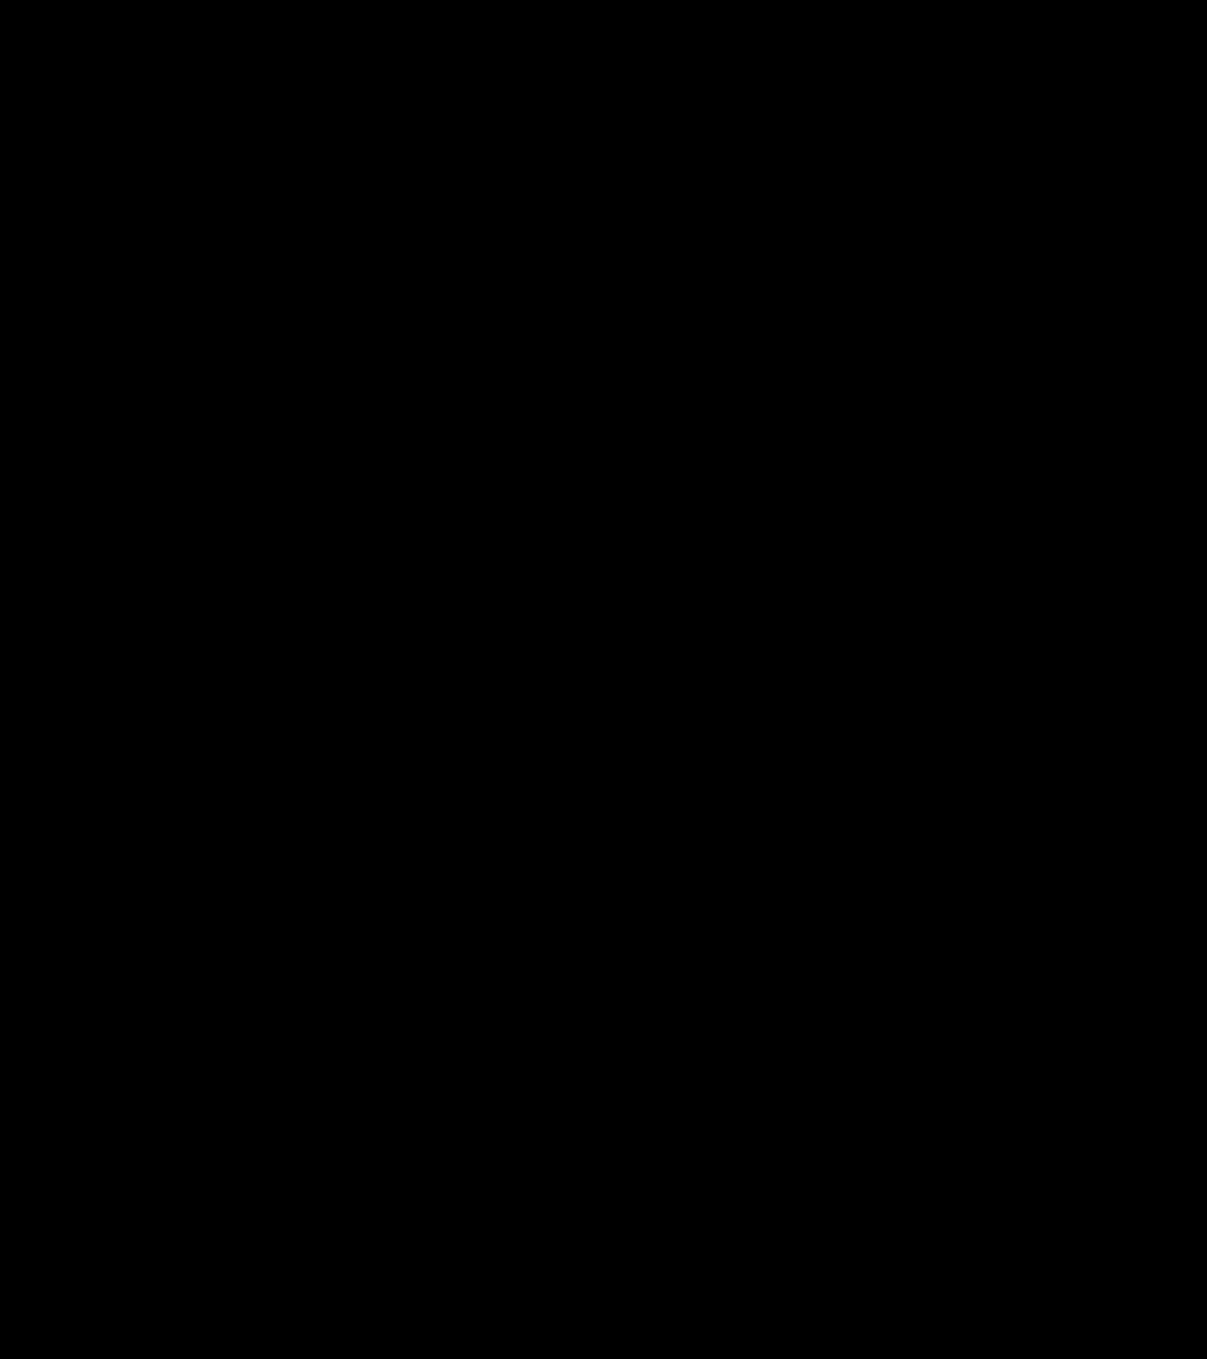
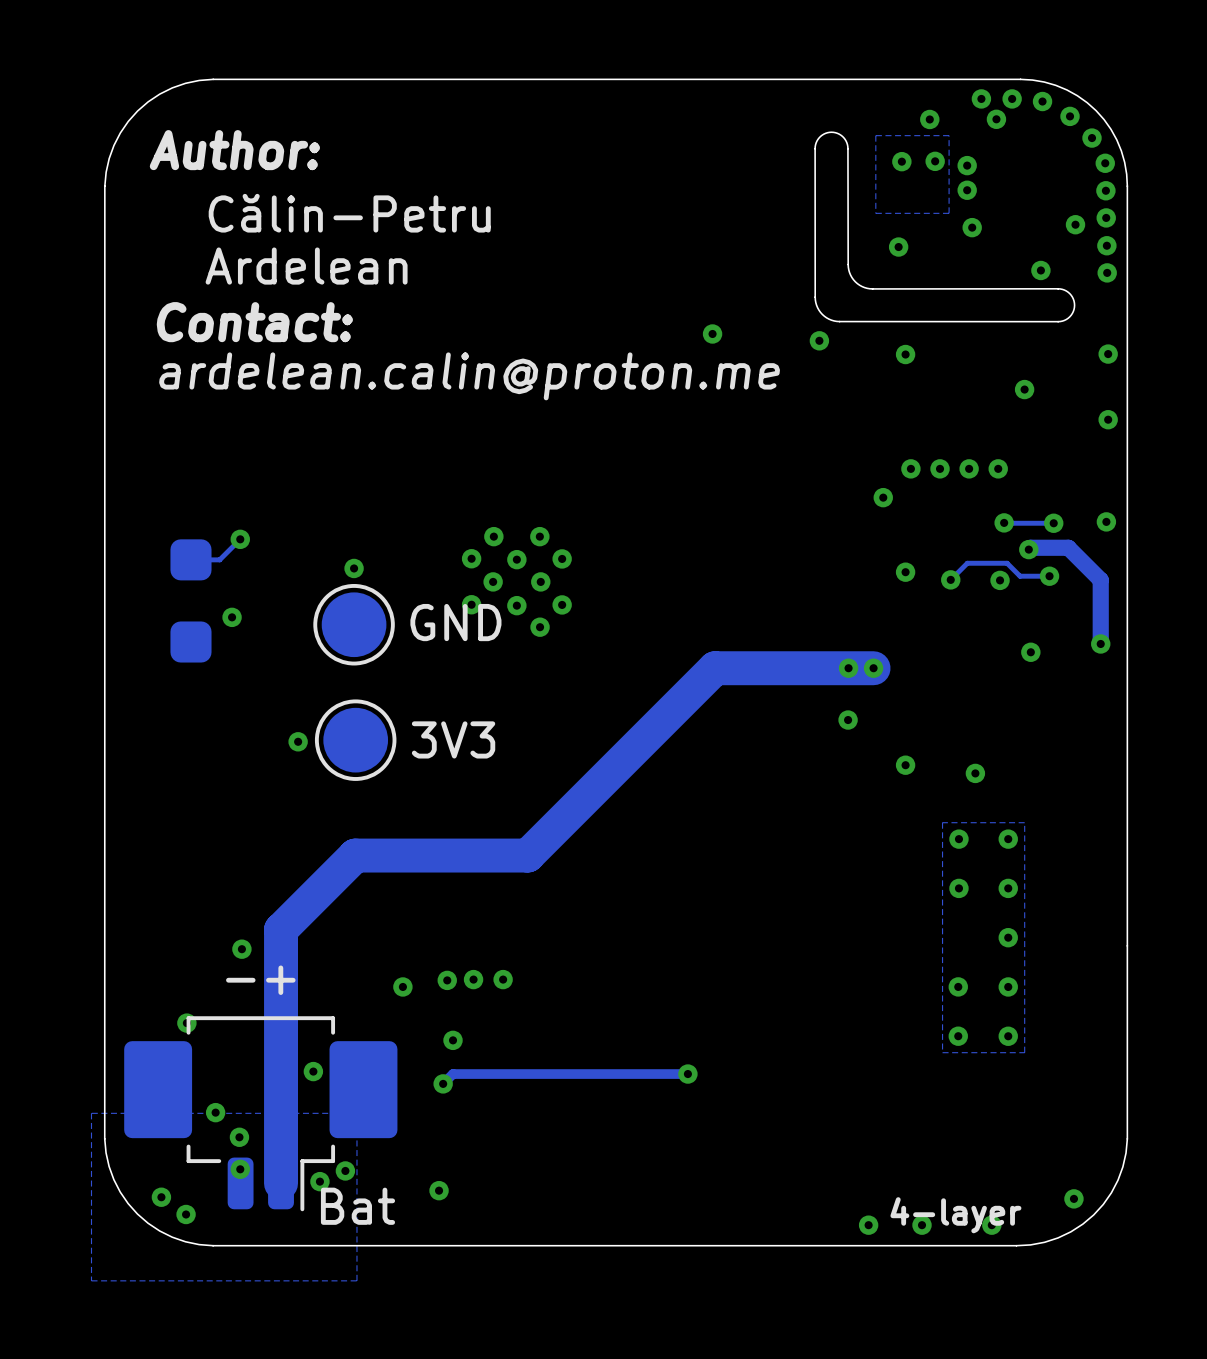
board edge: none -> (1020, 79) (213, 79) (185, 83) (159, 94) (137, 111) (128, 121) (120, 132) (109, 158) (104, 186) (104, 1138) (106, 1152) (113, 1179) (128, 1203) (148, 1223) (172, 1237) (185, 1241) (213, 1245) (1016, 1245) (1030, 1244) (1058, 1237) (1082, 1224) (1103, 1204) (1111, 1192) (1122, 1166) (1127, 1138) (1126, 174) (1121, 150) (1110, 129) (1087, 102) (1055, 85) (1020, 79)
via: none -> (981, 98)
via: none -> (1012, 98)
via: none -> (1042, 101)
via: none -> (1070, 116)
via: none -> (929, 119)
via: none -> (996, 119)
zone outline: none -> (949, 135) (949, 213) (875, 213) (875, 135) (949, 135)
via: none -> (1092, 138)
board edge: none -> (847, 148) (848, 267) (851, 277) (857, 283) (872, 288) (1060, 288) (1068, 292) (1073, 298) (1074, 307) (1071, 315) (1064, 320) (1058, 321) (839, 321) (824, 316) (817, 307) (815, 297) (815, 146) (822, 135) (833, 132) (843, 137) (847, 148)
text: none -> Author: (234, 150)
via: none -> (901, 161)
via: none -> (935, 161)
via: none -> (1105, 163)
via: none -> (967, 165)
via: none -> (967, 190)
via: none -> (1105, 190)
text: none -> Călin-Petru (349, 213)
via: none -> (1106, 217)
via: none -> (1075, 224)
via: none -> (972, 227)
via: none -> (1106, 245)
via: none -> (898, 247)
text: none -> Ardelean (306, 266)
via: none -> (1040, 270)
via: none -> (1107, 272)
text: none -> Contact: (254, 322)
via: none -> (712, 333)
via: none -> (819, 340)
via: none -> (905, 354)
via: none -> (1108, 354)
text: none -> ardelean.calin@proton.me (469, 376)
via: none -> (1024, 389)
via: none -> (1108, 419)
via: none -> (910, 468)
via: none -> (940, 468)
via: none -> (969, 468)
via: none -> (998, 468)
via: none -> (883, 497)
via: none -> (1106, 521)
via: none -> (1004, 522)
track: none -> (1053, 523) (1004, 523)
via: none -> (1053, 523)
via: none -> (493, 536)
via: none -> (539, 536)
track: none -> (240, 539) (219, 559) (190, 559)
via: none -> (240, 539)
track: none -> (1028, 549) (1030, 547) (1068, 547) (1100, 580) (1100, 643)
via: none -> (1028, 549)
via: none -> (471, 558)
via: none -> (562, 558)
via: none -> (516, 559)
via: none -> (354, 568)
via: none -> (905, 572)
track: none -> (1049, 576) (1020, 576) (1007, 563) (967, 563) (950, 579)
via: none -> (1049, 576)
via: none -> (950, 579)
via: none -> (1000, 580)
via: none -> (493, 581)
via: none -> (540, 581)
part: none -> (190, 600)
via: none -> (471, 604)
via: none -> (562, 604)
via: none -> (516, 605)
via: none -> (232, 617)
text: none -> GND (455, 622)
part: none -> (354, 624)
via: none -> (540, 627)
via: none -> (1100, 643)
via: none -> (1030, 652)
via: none -> (848, 668)
track: none -> (873, 668) (715, 668) (527, 855) (355, 855) (281, 929) (281, 1183)
via: none -> (873, 668)
via: none -> (848, 720)
text: none -> 3V3 (453, 739)
part: none -> (355, 740)
via: none -> (298, 741)
via: none -> (905, 765)
via: none -> (975, 773)
zone outline: none -> (1024, 822) (1024, 1052) (942, 1052) (942, 822) (1024, 822)
via: none -> (958, 839)
via: none -> (1008, 839)
via: none -> (958, 888)
via: none -> (1008, 888)
via: none -> (1008, 937)
via: none -> (241, 949)
via: none -> (473, 979)
via: none -> (503, 979)
text: none -> +- (260, 980)
via: none -> (447, 980)
via: none -> (402, 986)
via: none -> (958, 986)
via: none -> (1008, 986)
via: none -> (186, 1023)
via: none -> (958, 1036)
via: none -> (1008, 1036)
via: none -> (453, 1040)
via: none -> (313, 1071)
track: none -> (687, 1074) (453, 1074) (443, 1083)
via: none -> (687, 1074)
via: none -> (443, 1083)
via: none -> (215, 1112)
part: none -> (260, 1113)
zone outline: none -> (356, 1113) (356, 1280) (91, 1280) (91, 1113) (356, 1113)
via: none -> (239, 1137)
via: none -> (240, 1169)
via: none -> (345, 1170)
via: none -> (319, 1181)
via: none -> (439, 1190)
via: none -> (161, 1197)
via: none -> (1073, 1198)
text: none -> Bat (357, 1206)
via: none -> (186, 1214)
text: none -> 4-layer (955, 1215)
via: none -> (868, 1225)
via: none -> (922, 1225)
via: none -> (991, 1225)

